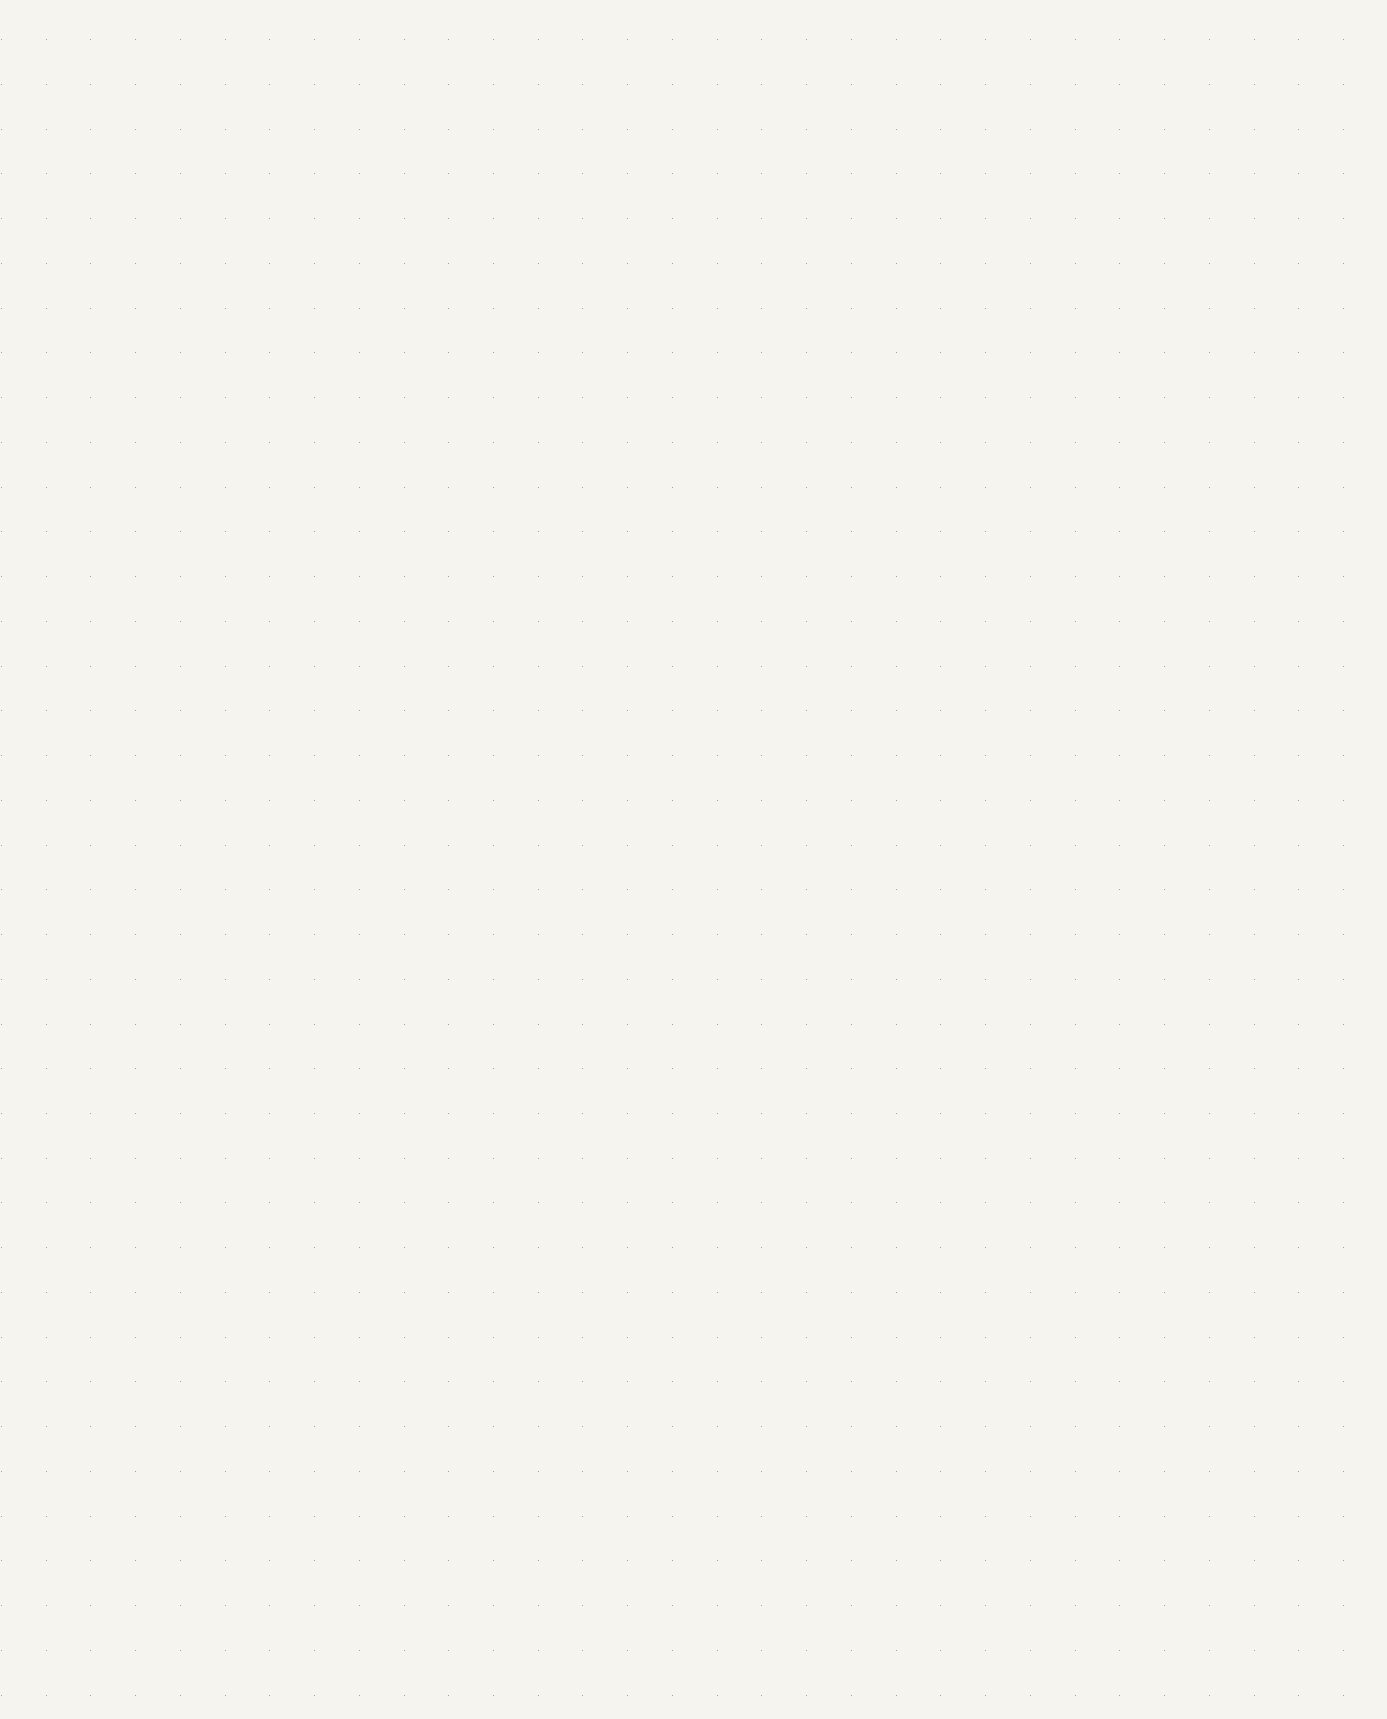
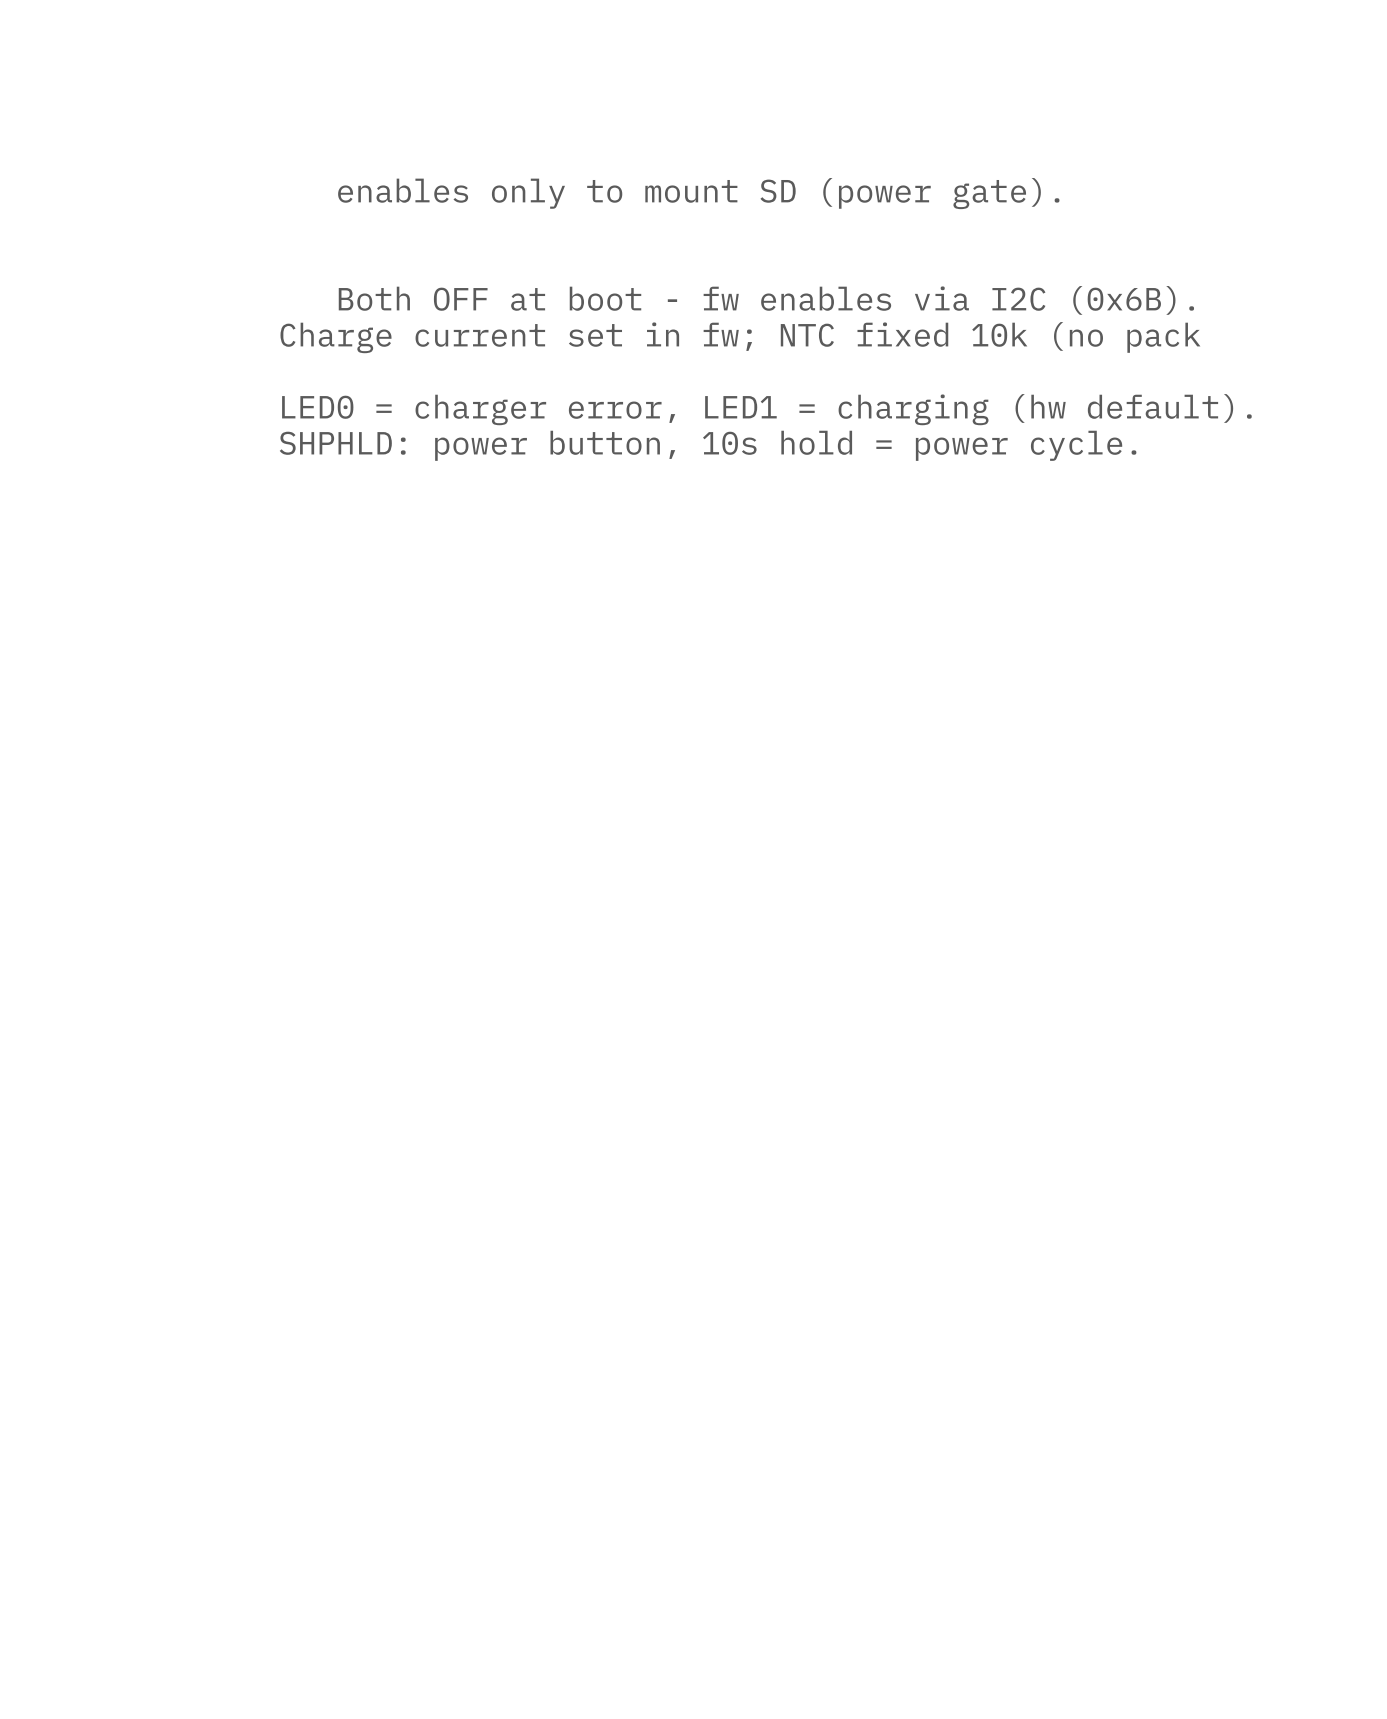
text: none -> enables only to mount SD (power gate). (698, 193)
text: none -> Both OFF at boot - fw enables via I2C (0x6B). (766, 300)
text: none -> Charge current set in fw; NTC fixed 10k (no pack (740, 337)
text: none -> LED0 = charger error, LED1 = charging (hw default). (766, 409)
text: none -> SHPHLD: power button, 10s hold = power cycle. (708, 445)

